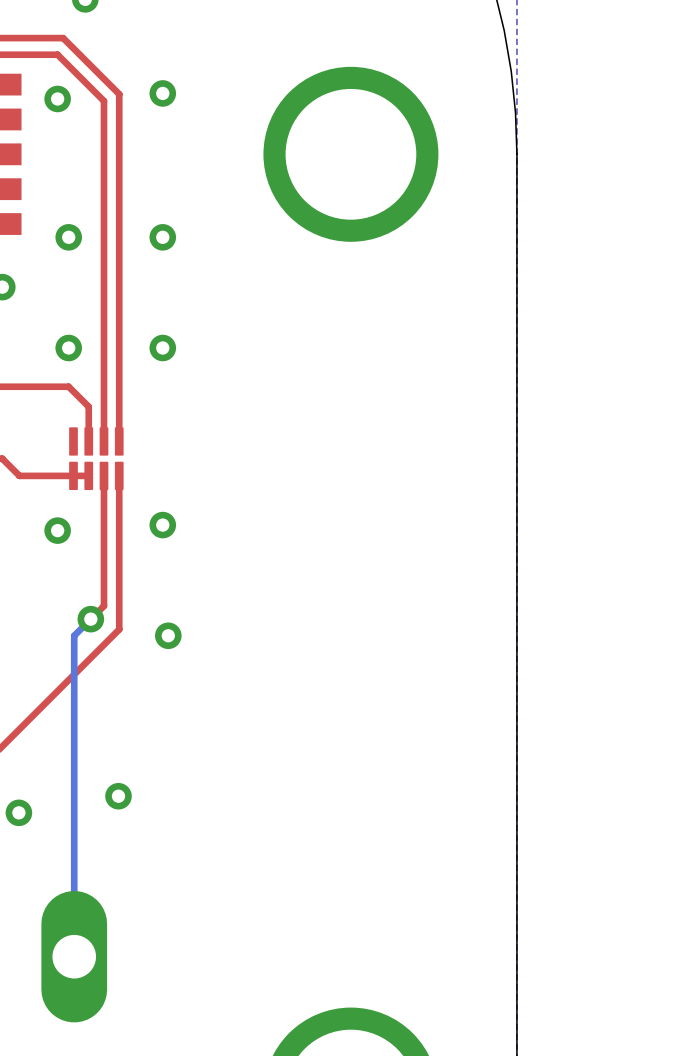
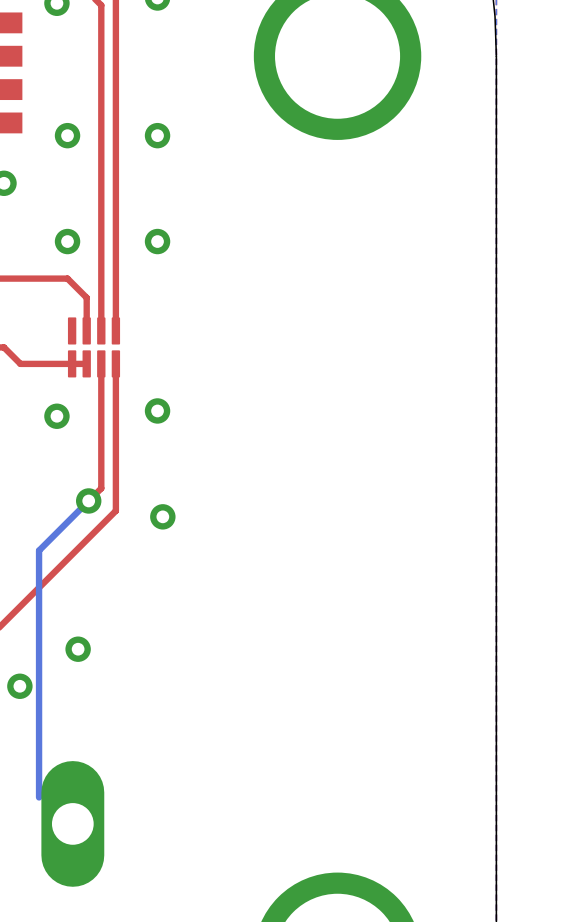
bottom track: (74, 635) (74, 956) -> (72, 516) (39, 550) (39, 797)
via position: (118, 796) -> (78, 649)

